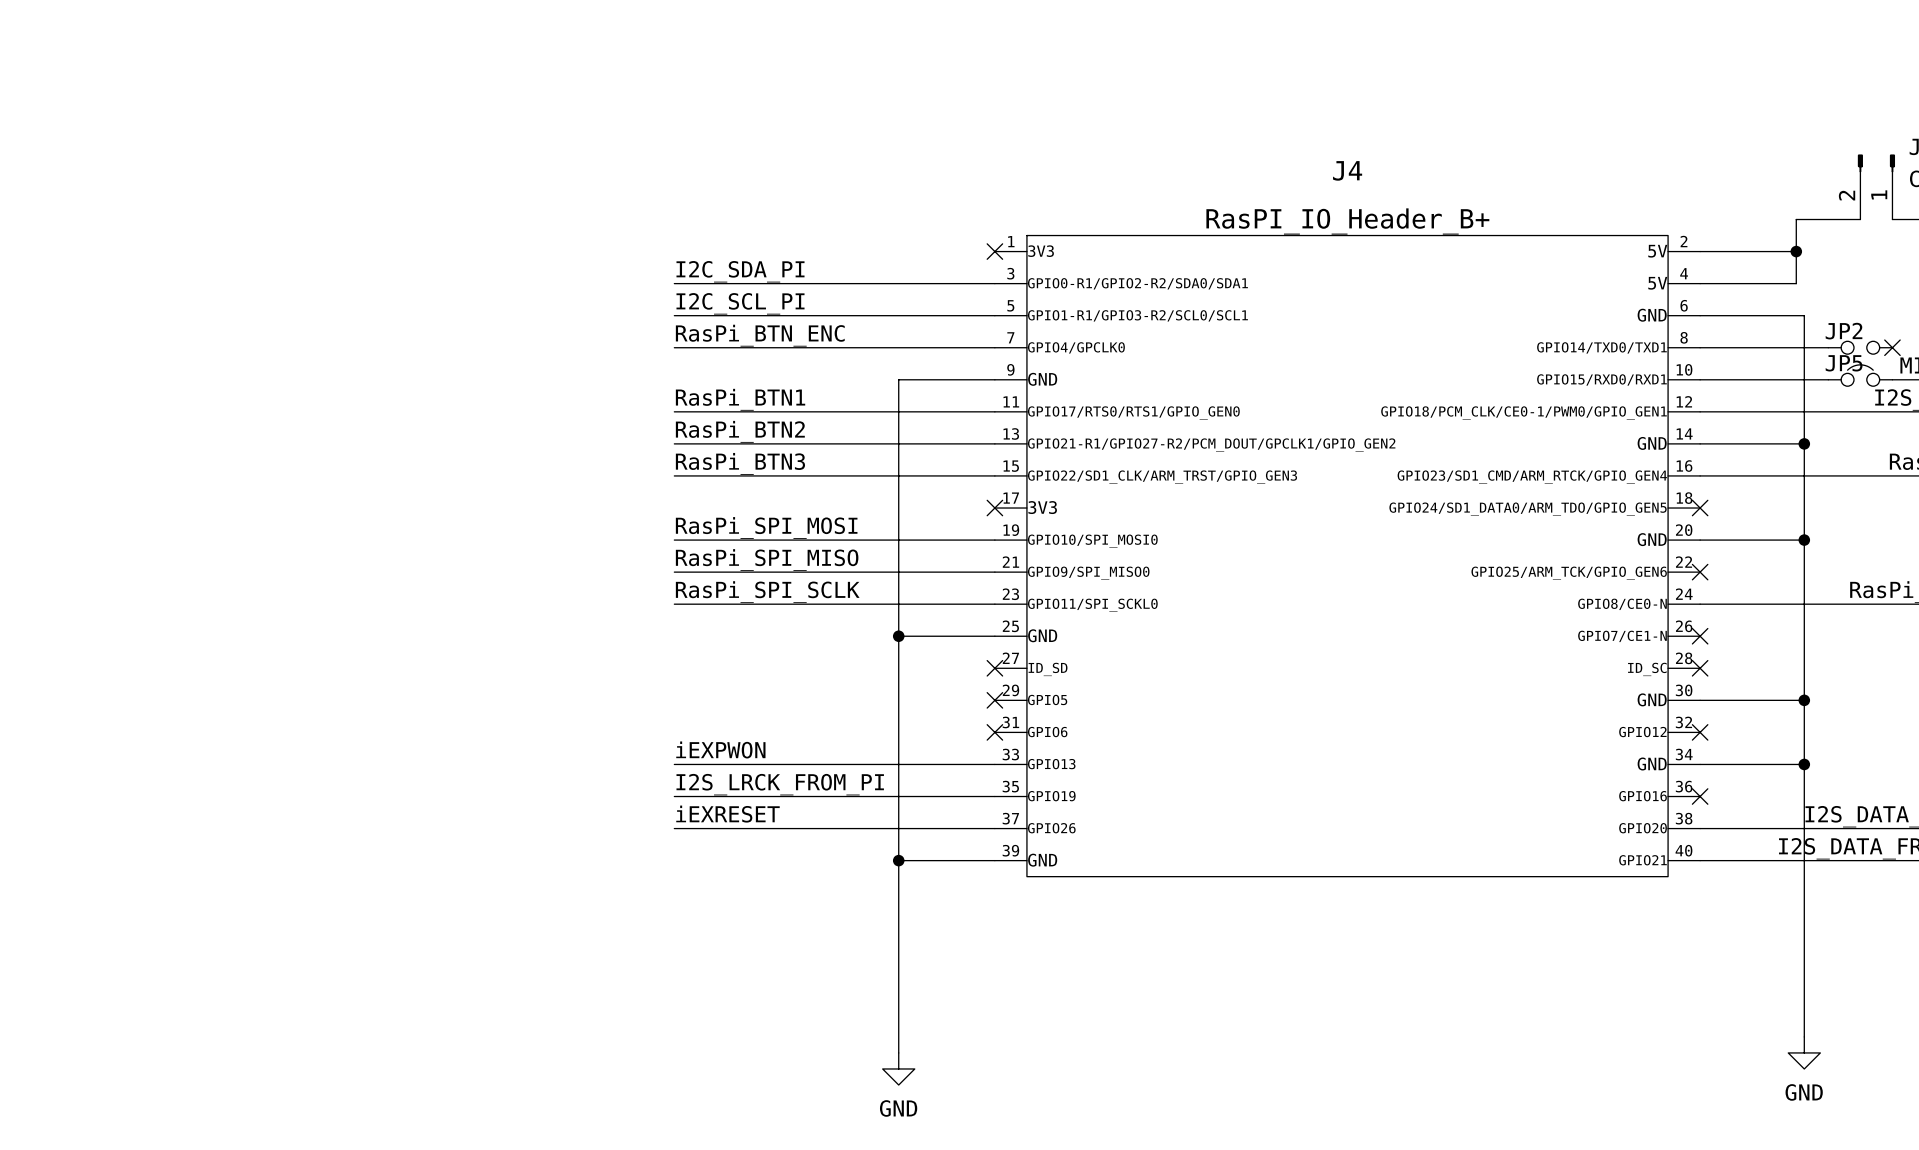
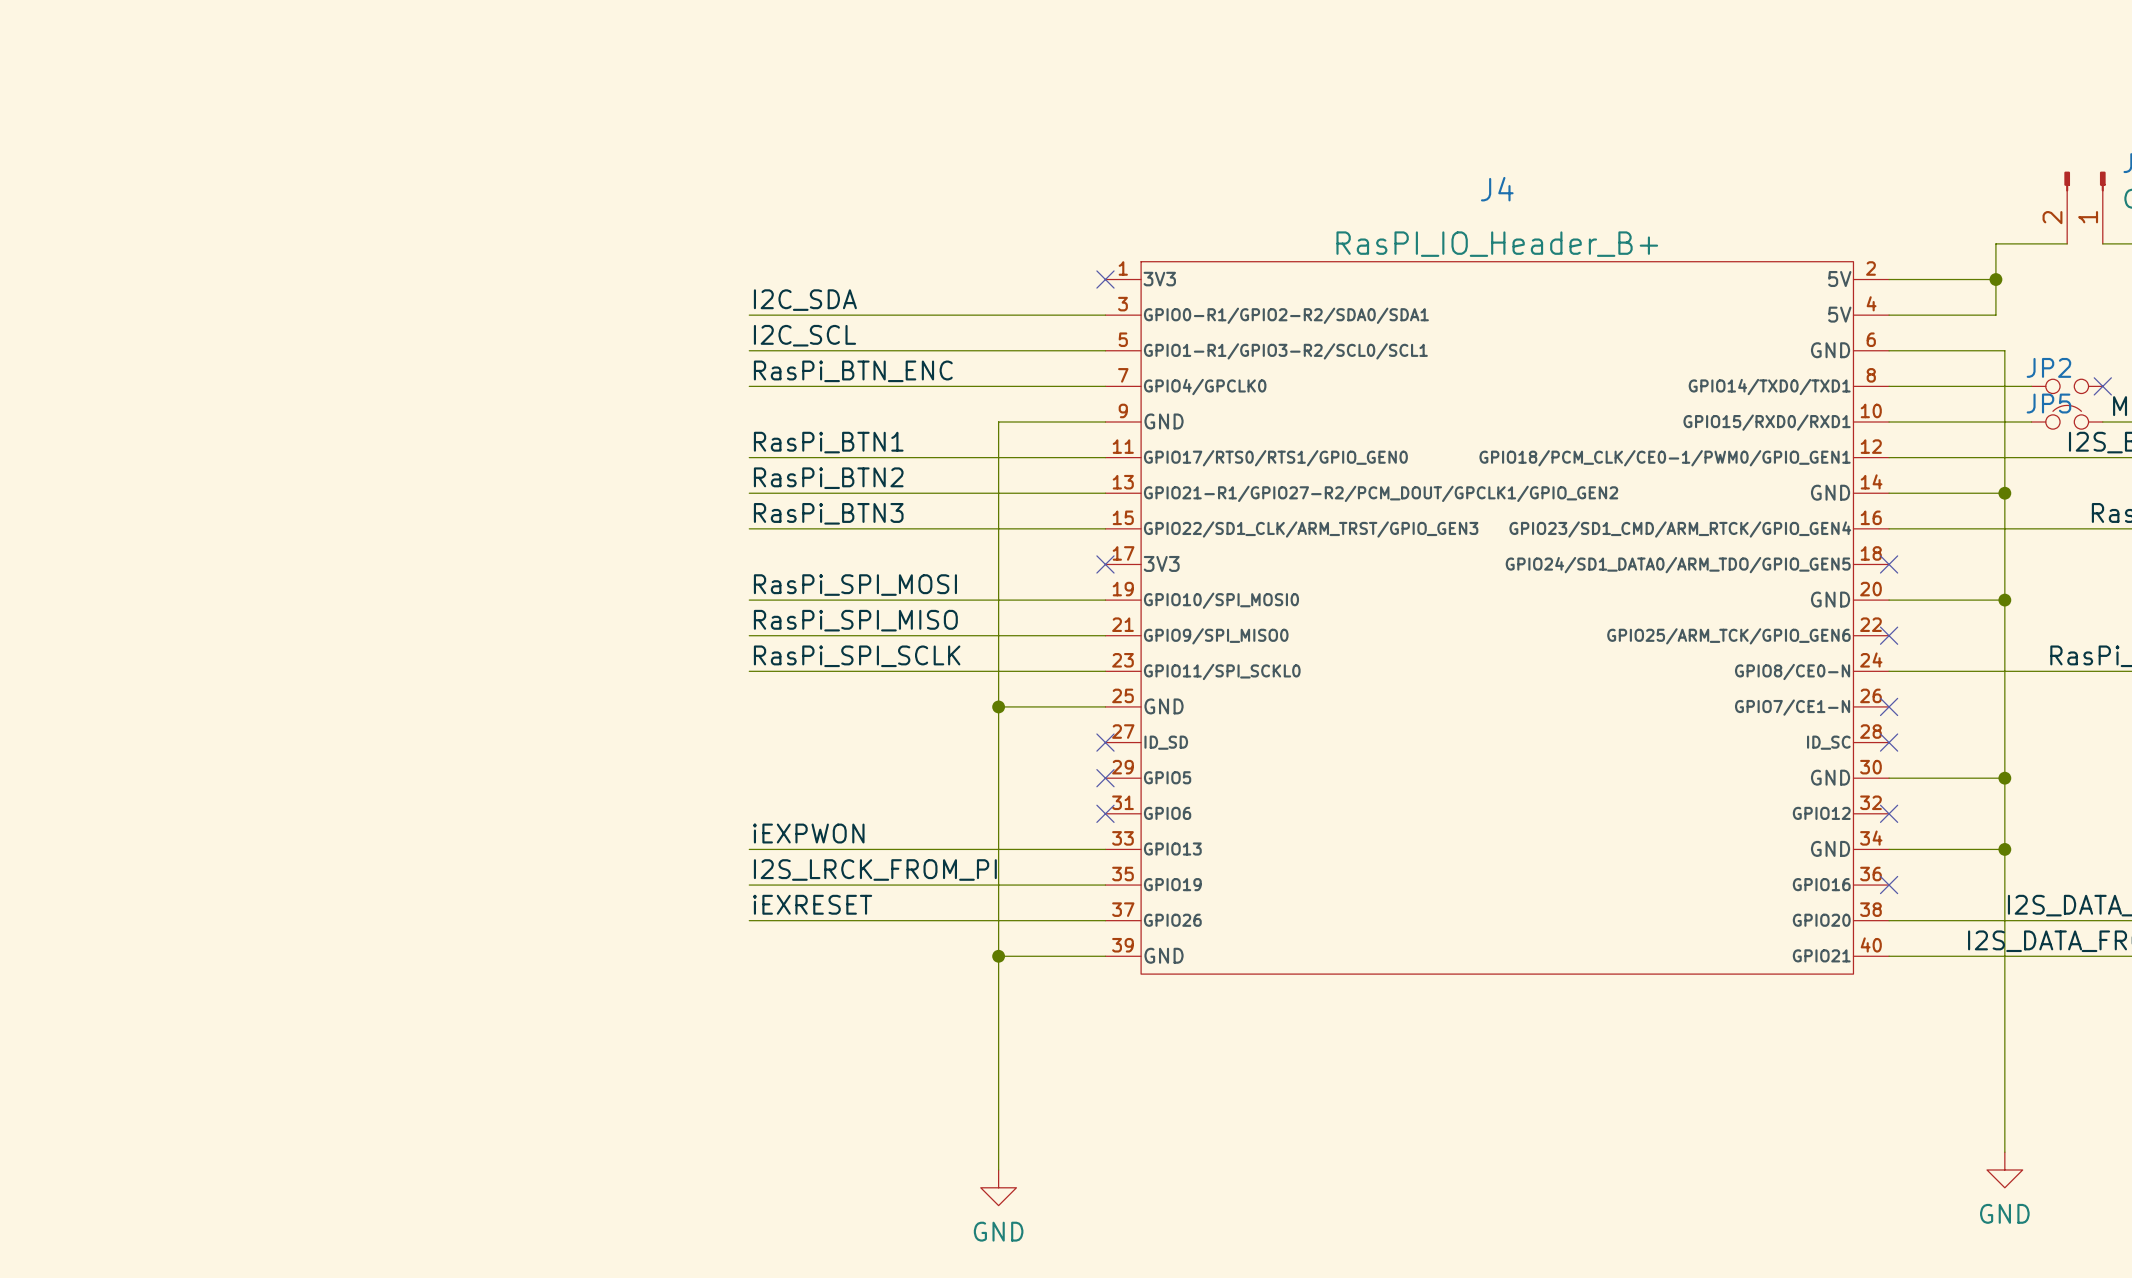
label: I2C_SDA_PI (740, 271) -> I2C_SDA (805, 300)
label: I2C_SCL_PI (740, 303) -> I2C_SCL (804, 335)

